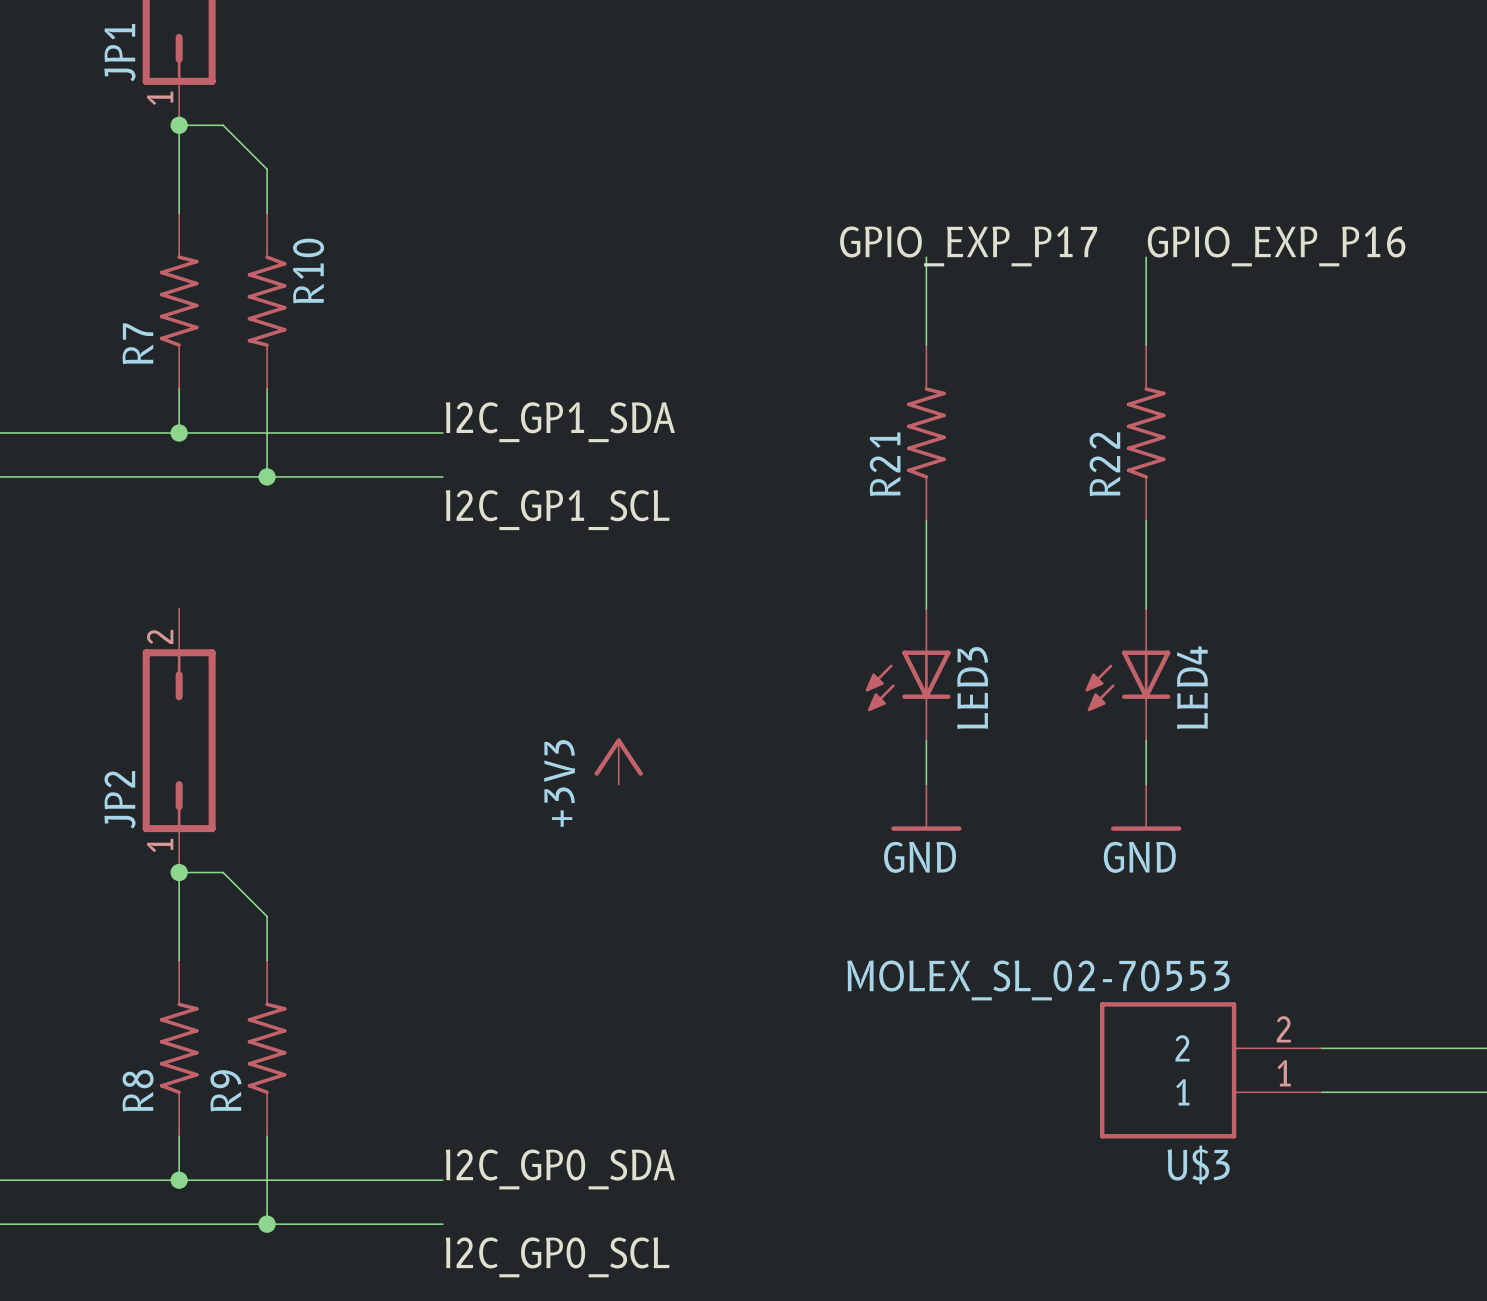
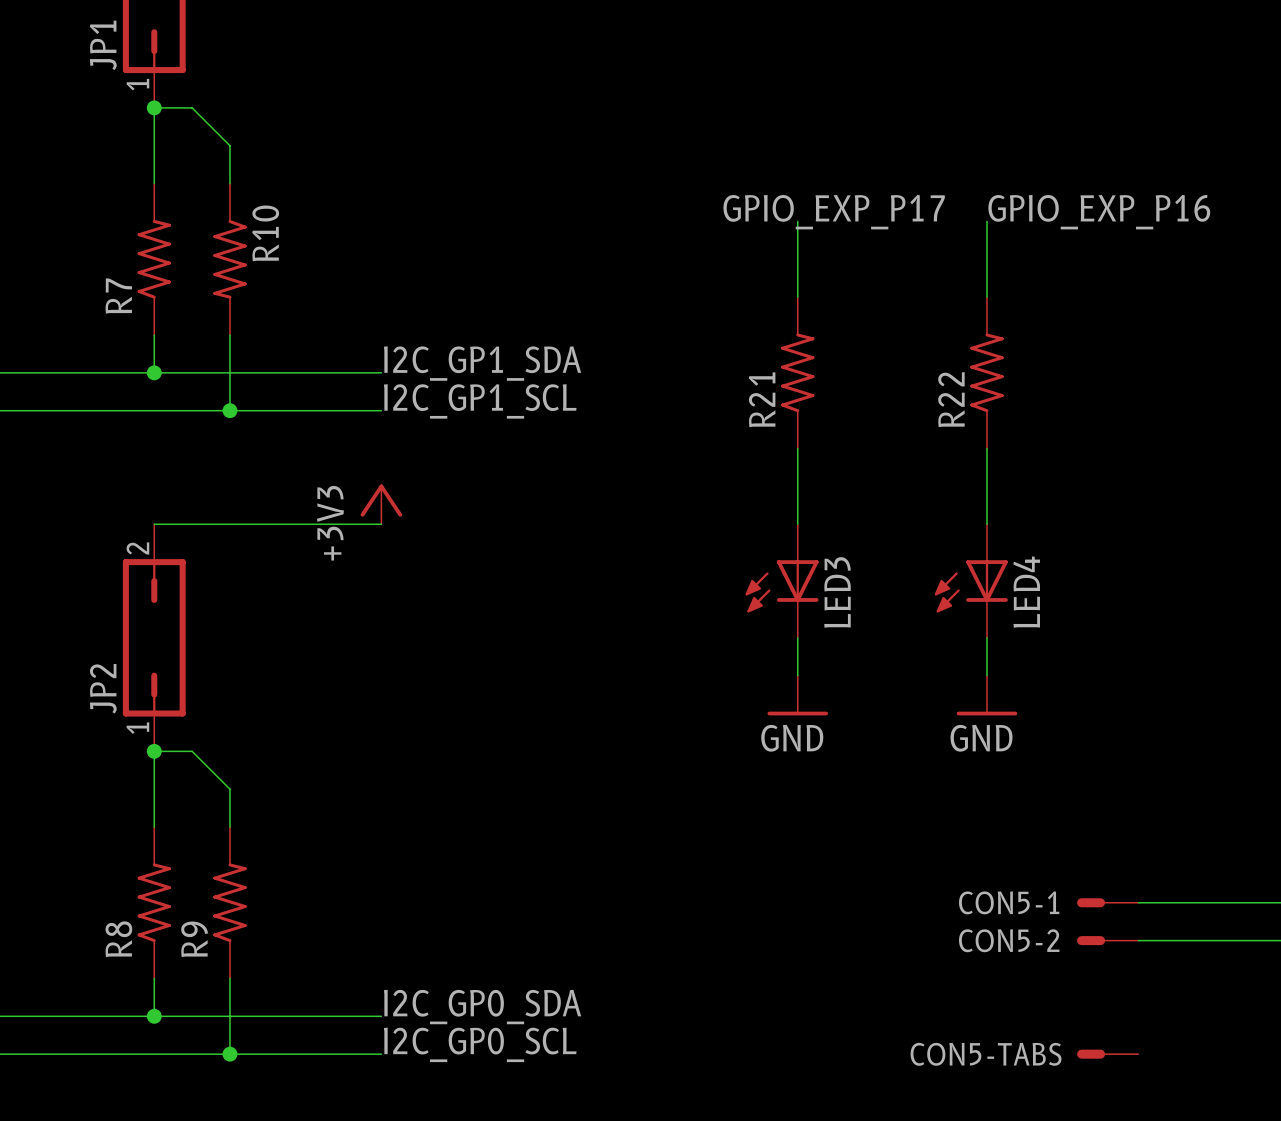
label position: I2C_GP1_SCL (557, 510) -> I2C_GP1_SCL (480, 401)
wire: none -> (154, 524) (381, 524)
power symbol position: +3V3 (618, 761) -> +3V3 (381, 504)
CON5-1: none -> (1107, 902)
U$3: MOLEX_SL_02-70553 (1211, 1070) -> none
CON5-2: none -> (1107, 940)
CON5-TABS: none -> (1107, 1054)
label position: I2C_GP0_SCL (557, 1257) -> I2C_GP0_SCL (480, 1044)

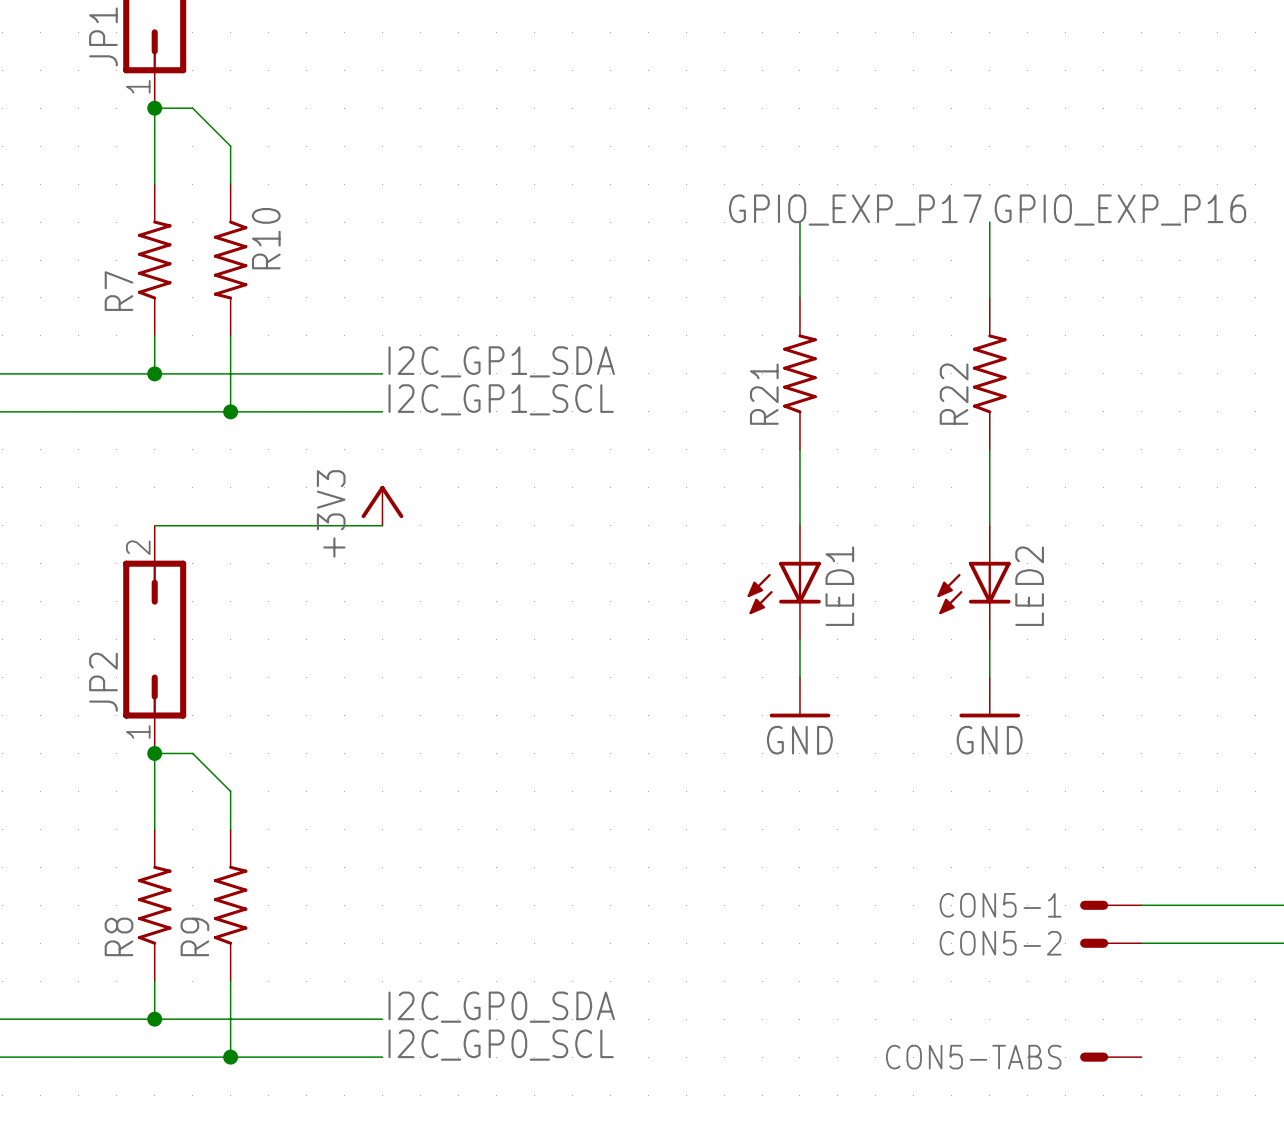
LED3 name: LED3 (837, 592) -> LED1 (839, 586)
LED4 name: LED4 (1026, 592) -> LED2 (1029, 586)

